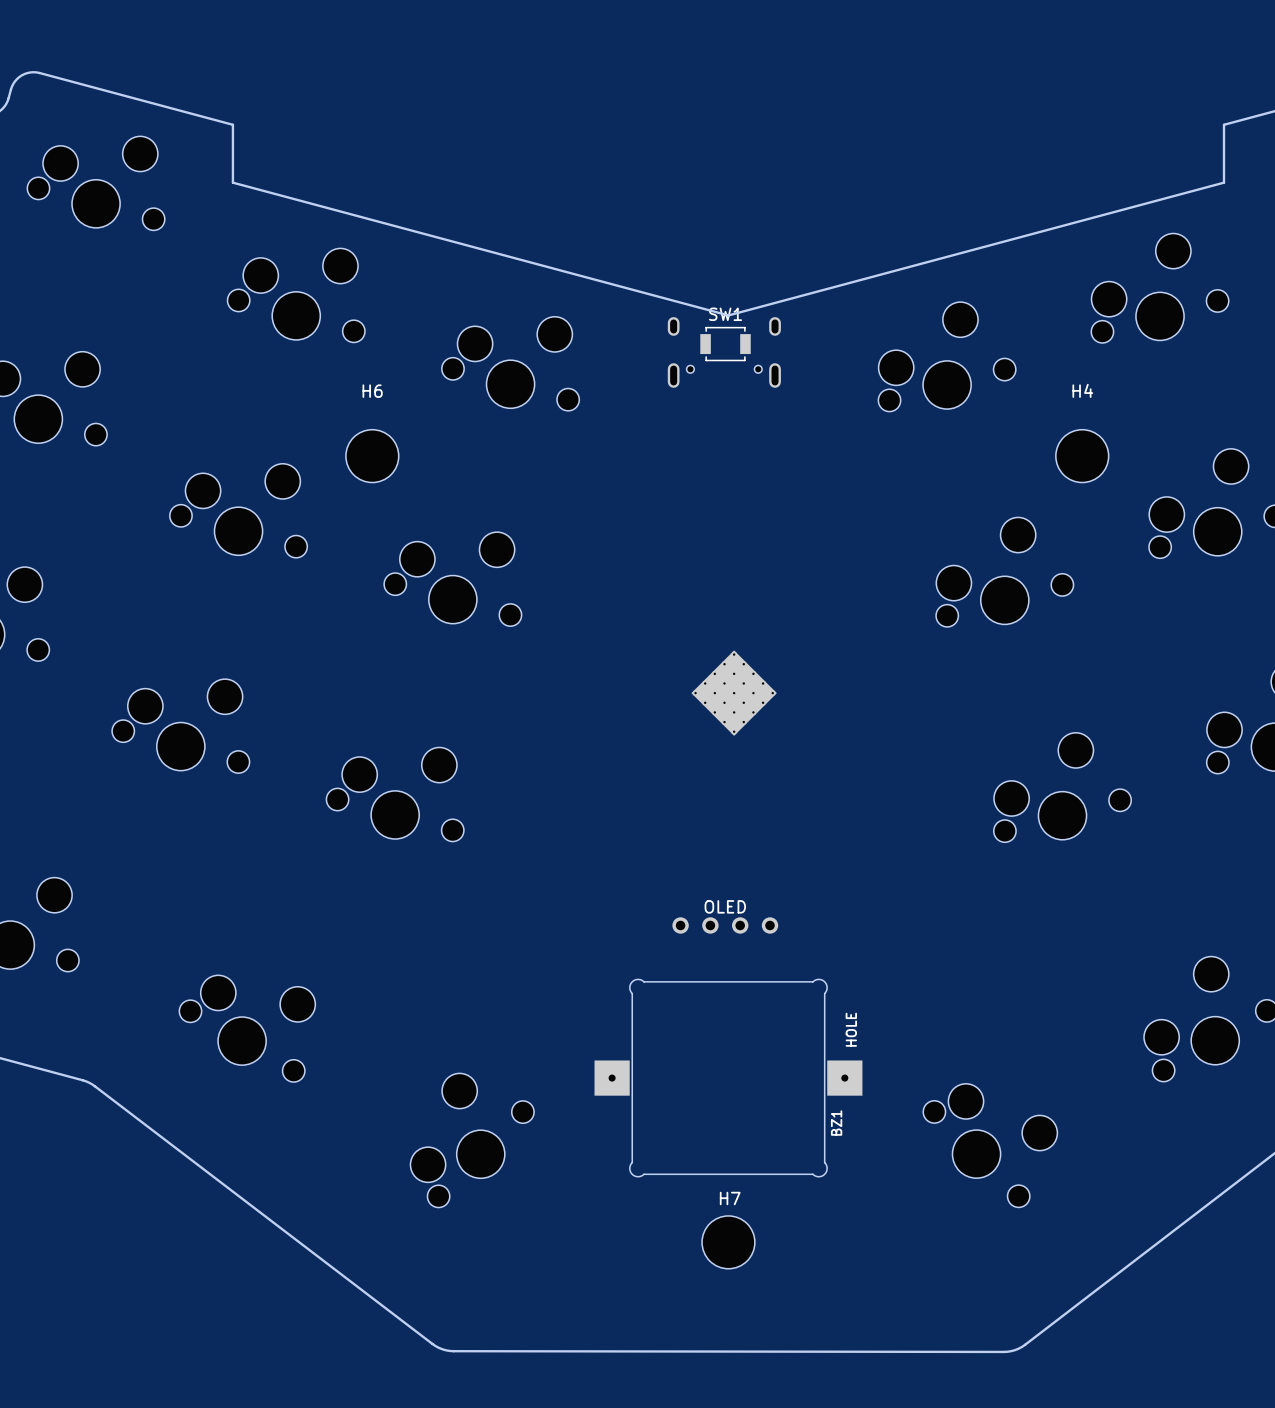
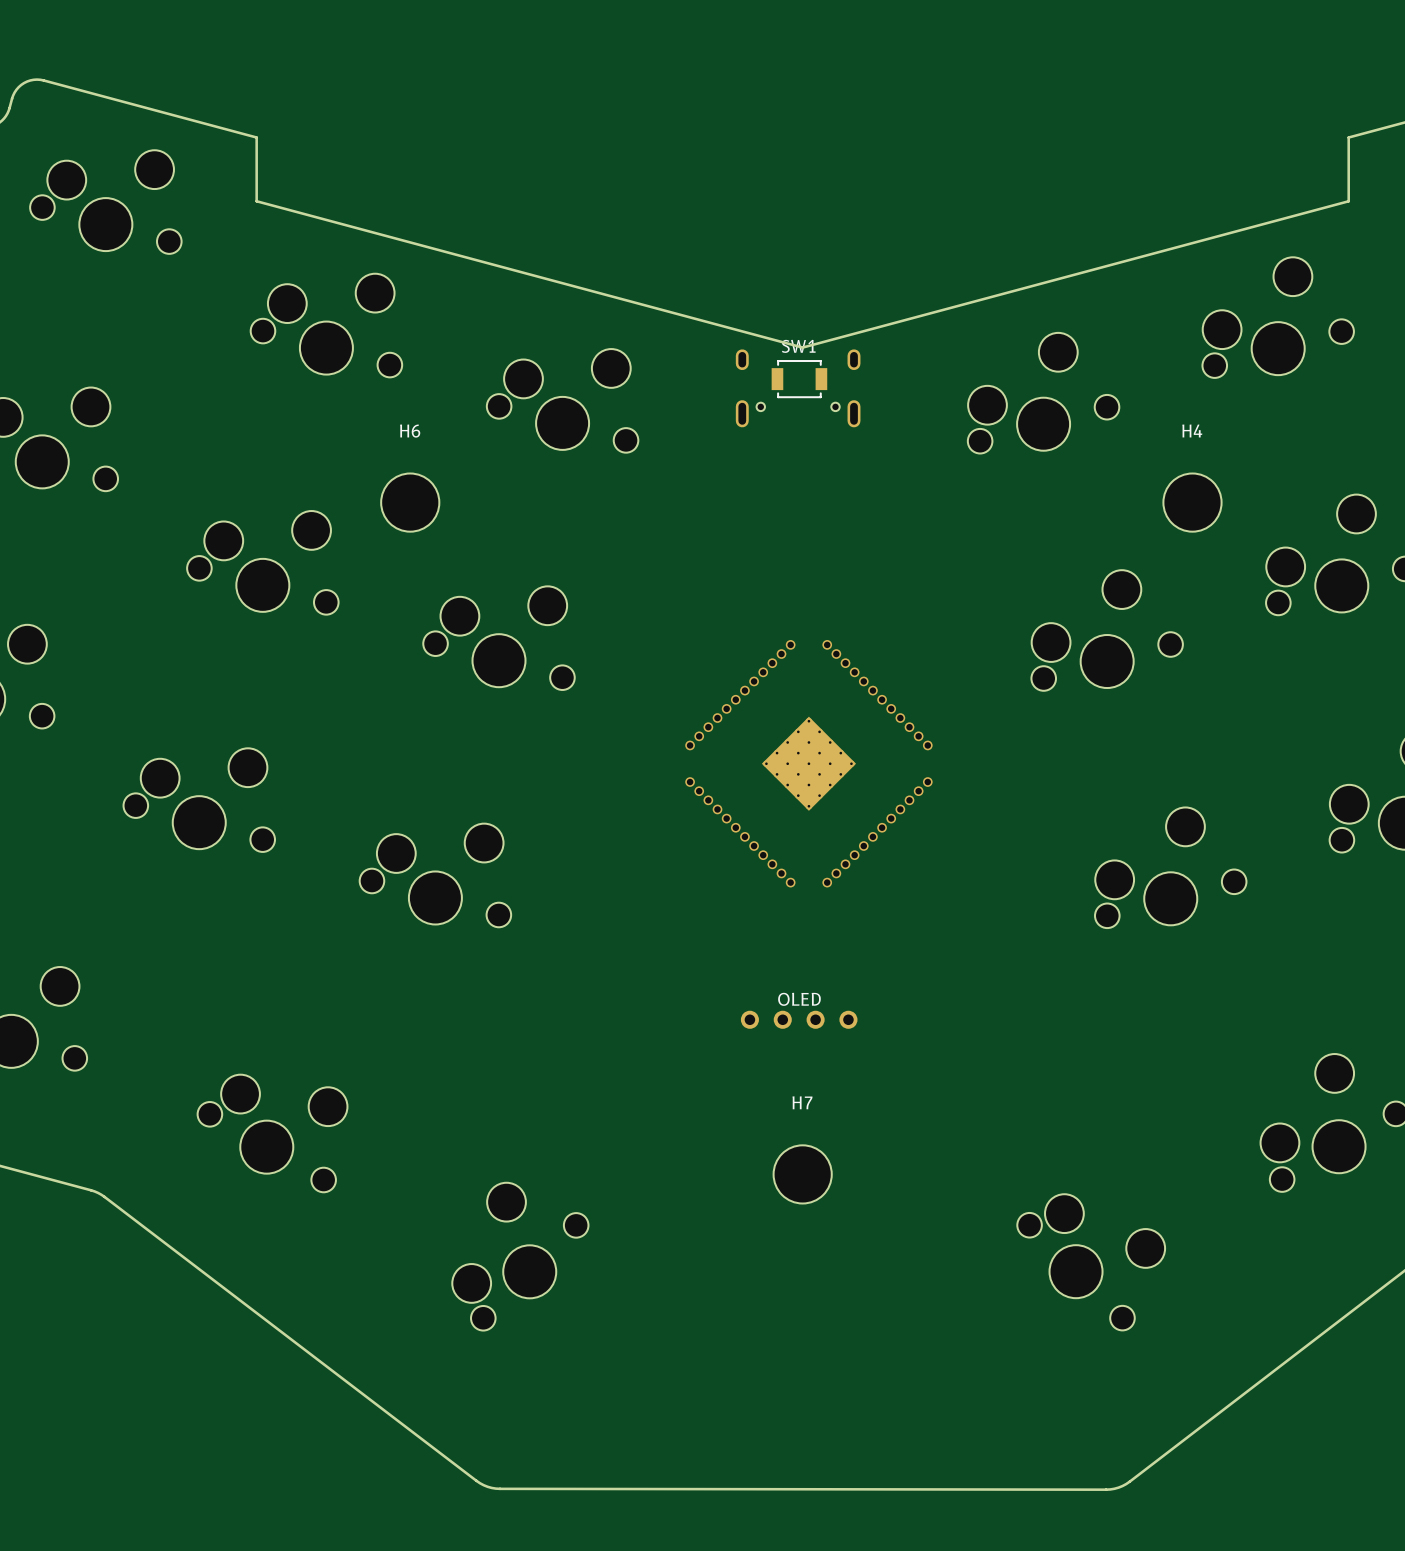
part footprint: [691, 650, 777, 736] -> [685, 640, 933, 888]
BZ1: (728, 1078) -> none
H7 name position: H7 (730, 1198) -> H7 (802, 1102)
H7 position: (728, 1242) -> (802, 1174)

